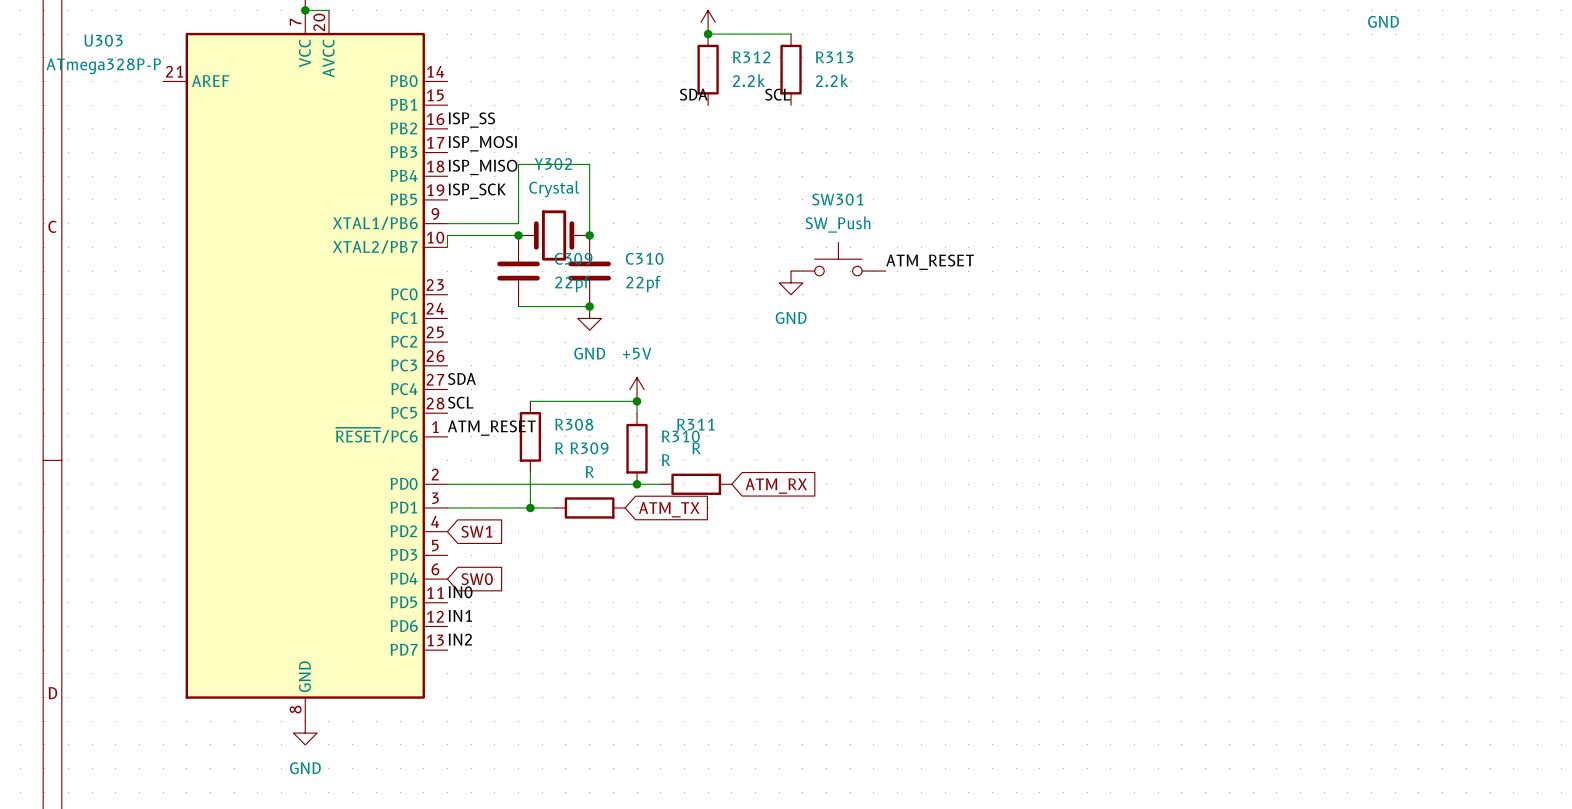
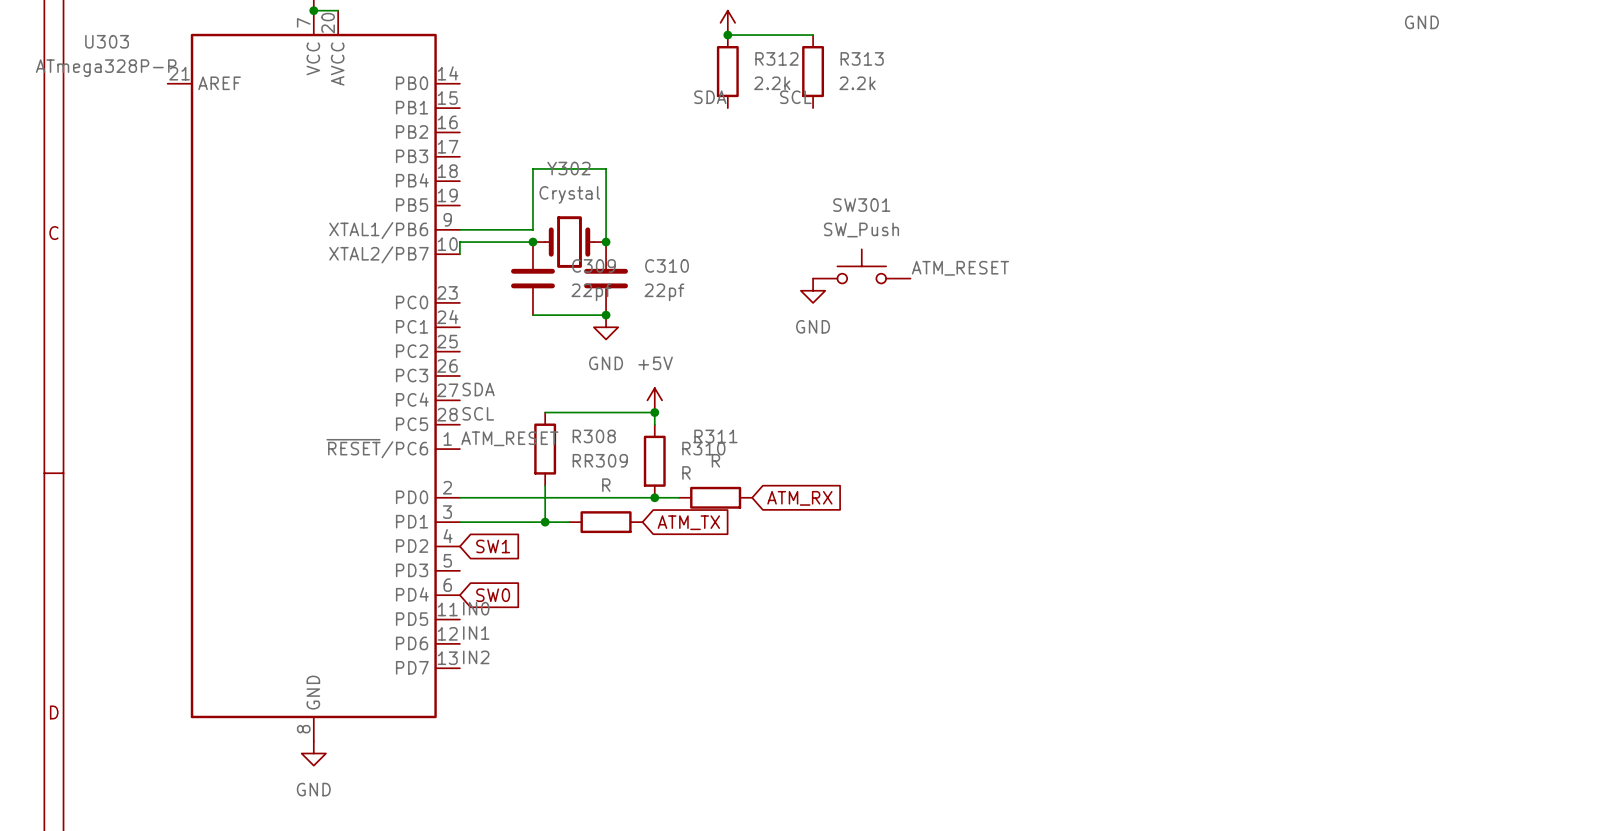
label: ISP_SS (471, 120) -> none
label: ISP_MOSI (482, 143) -> none
label: ISP_MISO (483, 167) -> none
label: ISP_SCK (477, 191) -> none

